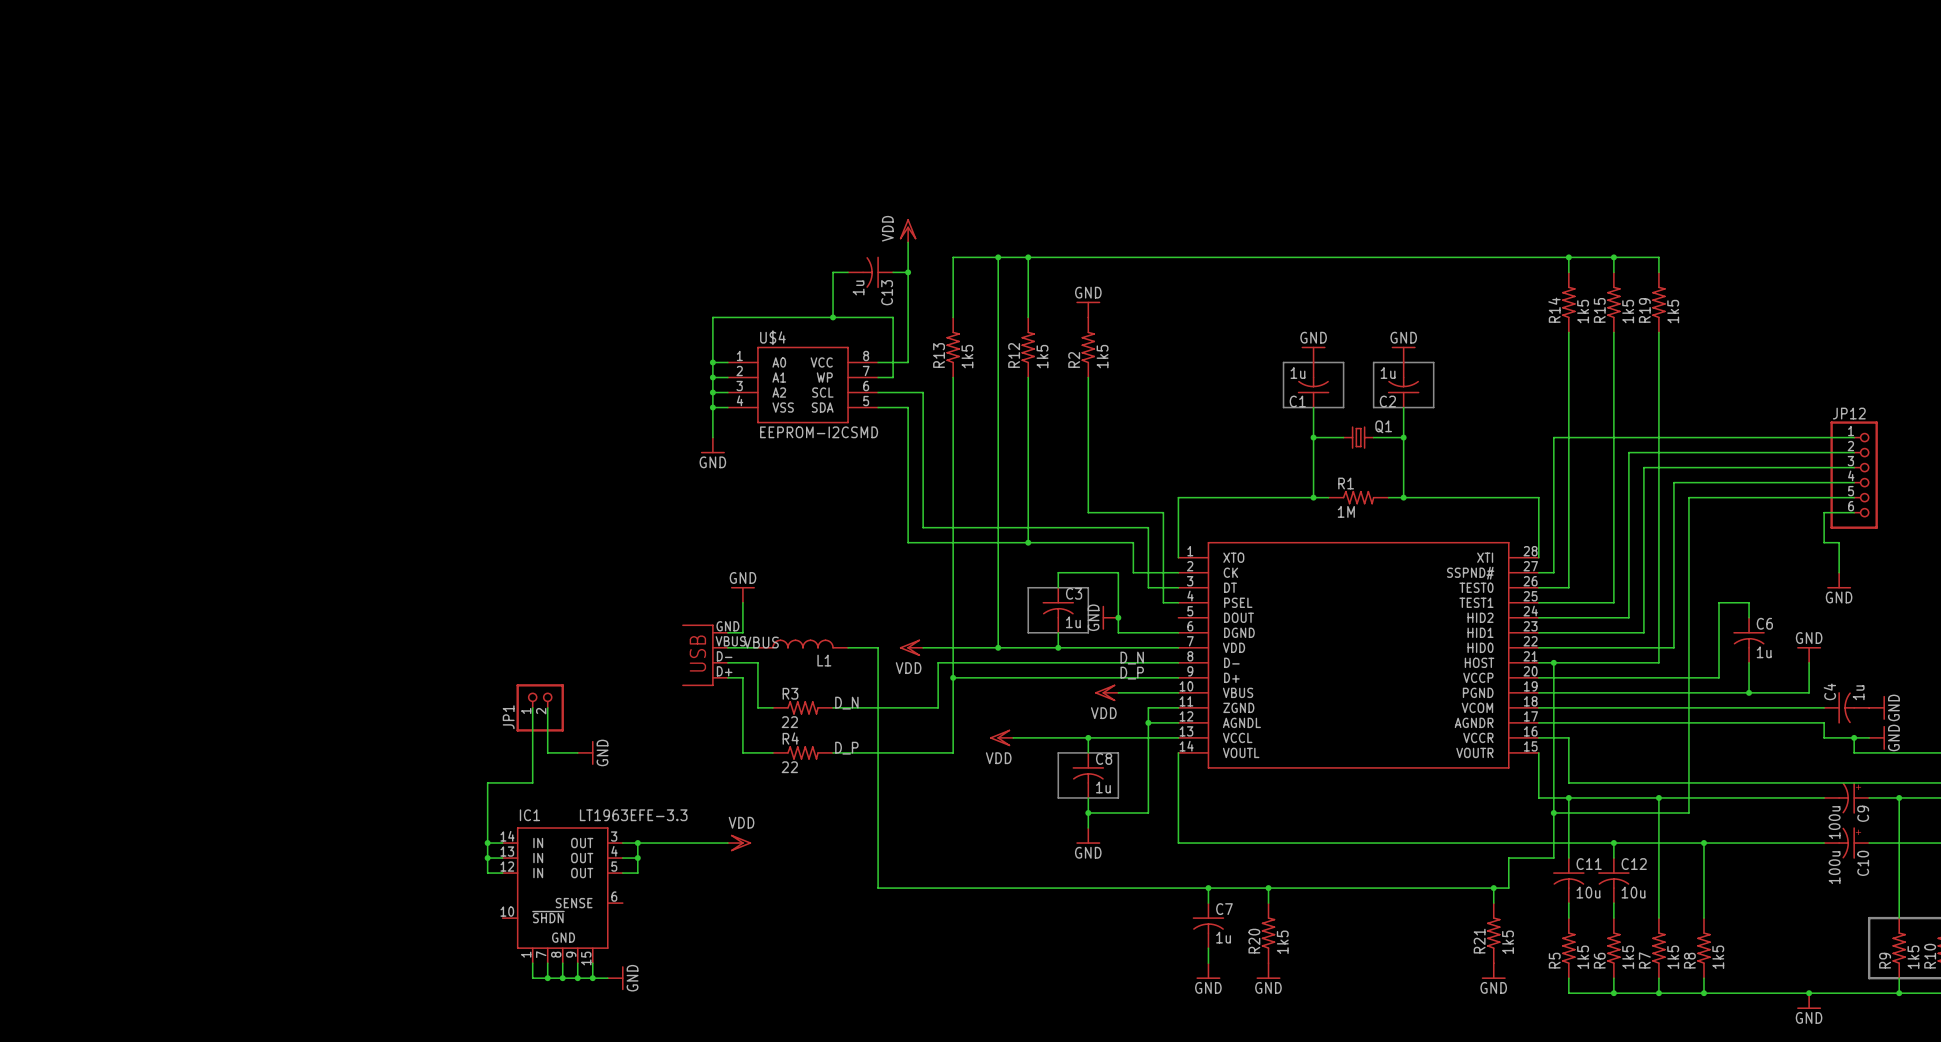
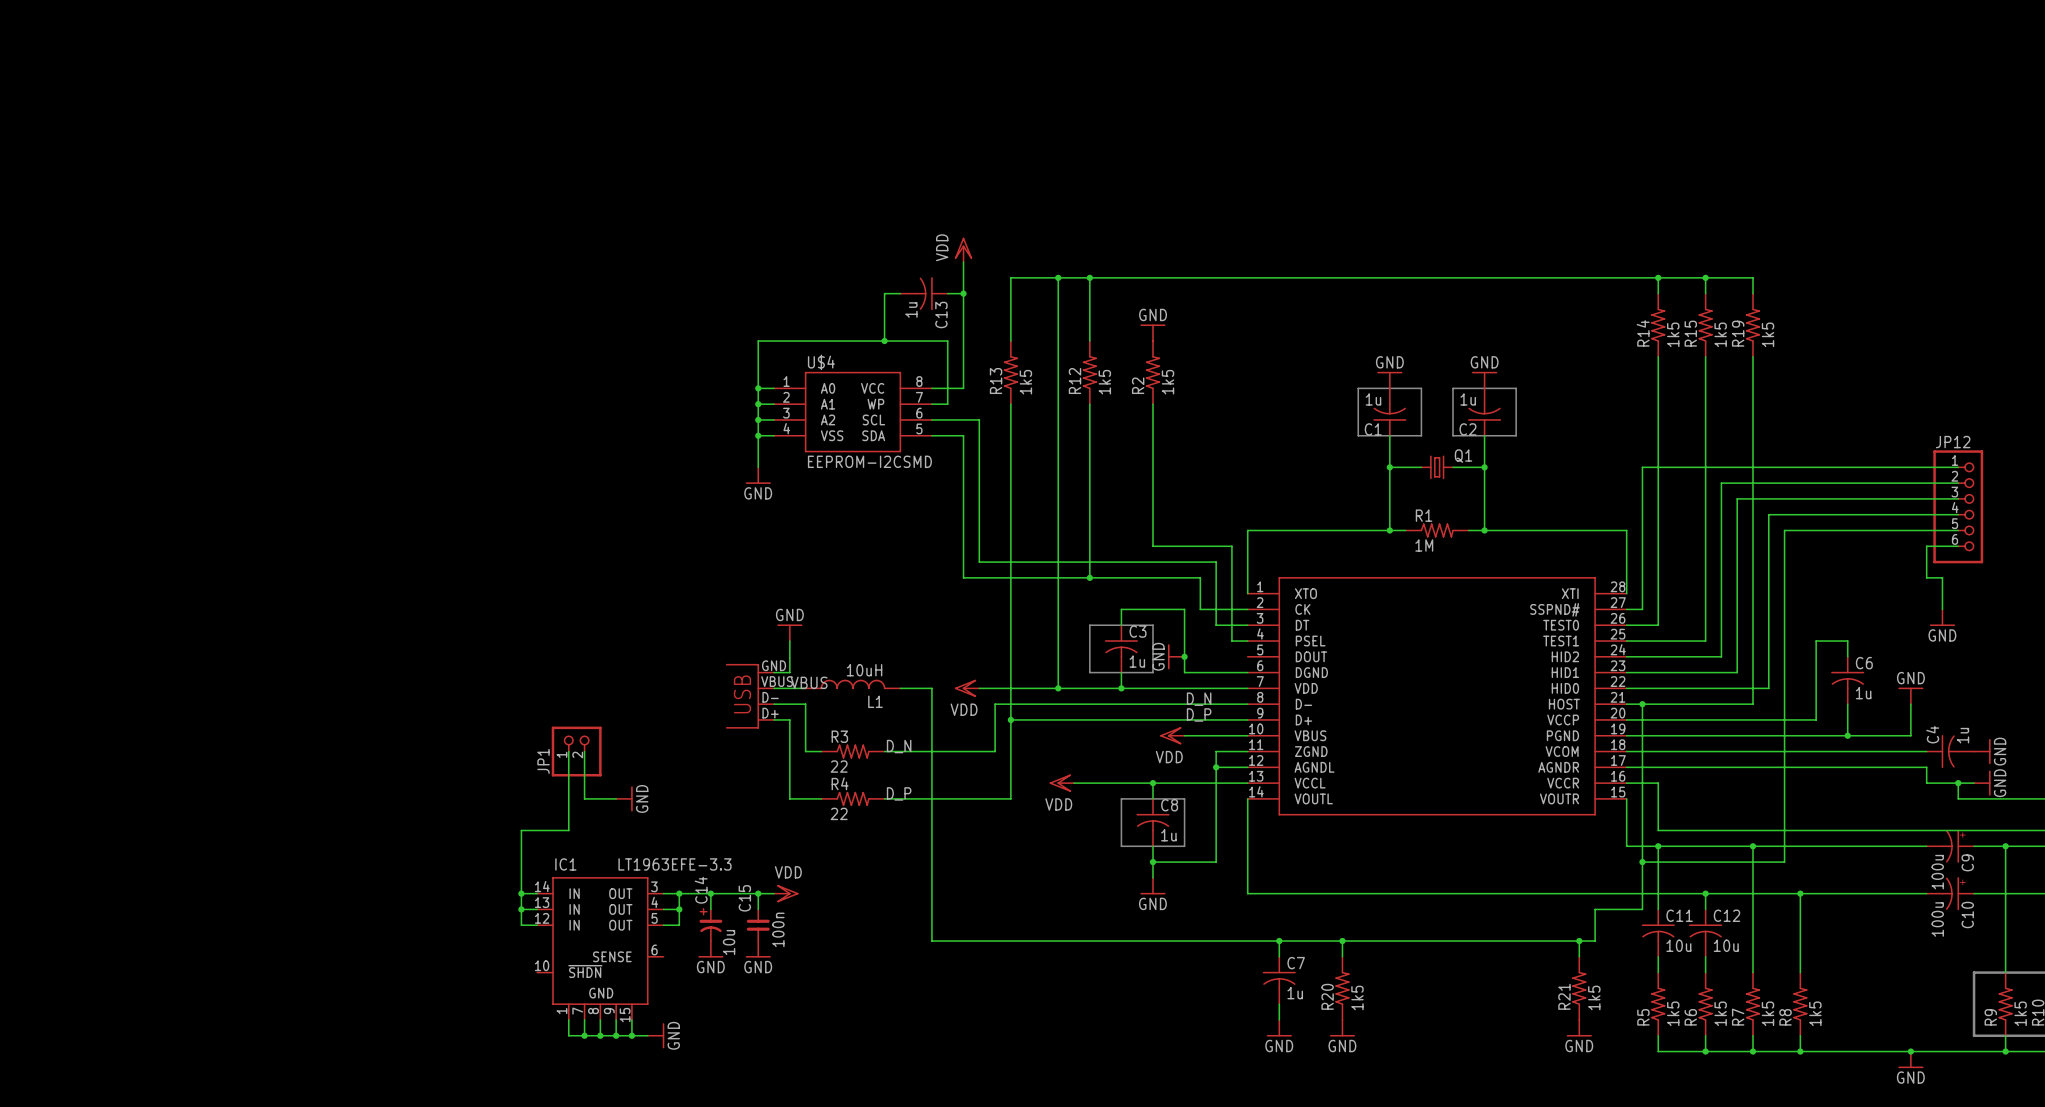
L1 value: none -> 10uH (864, 670)
wire: none -> (710, 893) (710, 909)
junction: none -> (710, 893)
wire: none -> (758, 893) (758, 909)
junction: none -> (758, 893)
C14: none -> 10u (710, 925)
C15: none -> 100n (758, 925)
power symbol: none -> GND (710, 949)
power symbol: none -> GND (758, 949)

